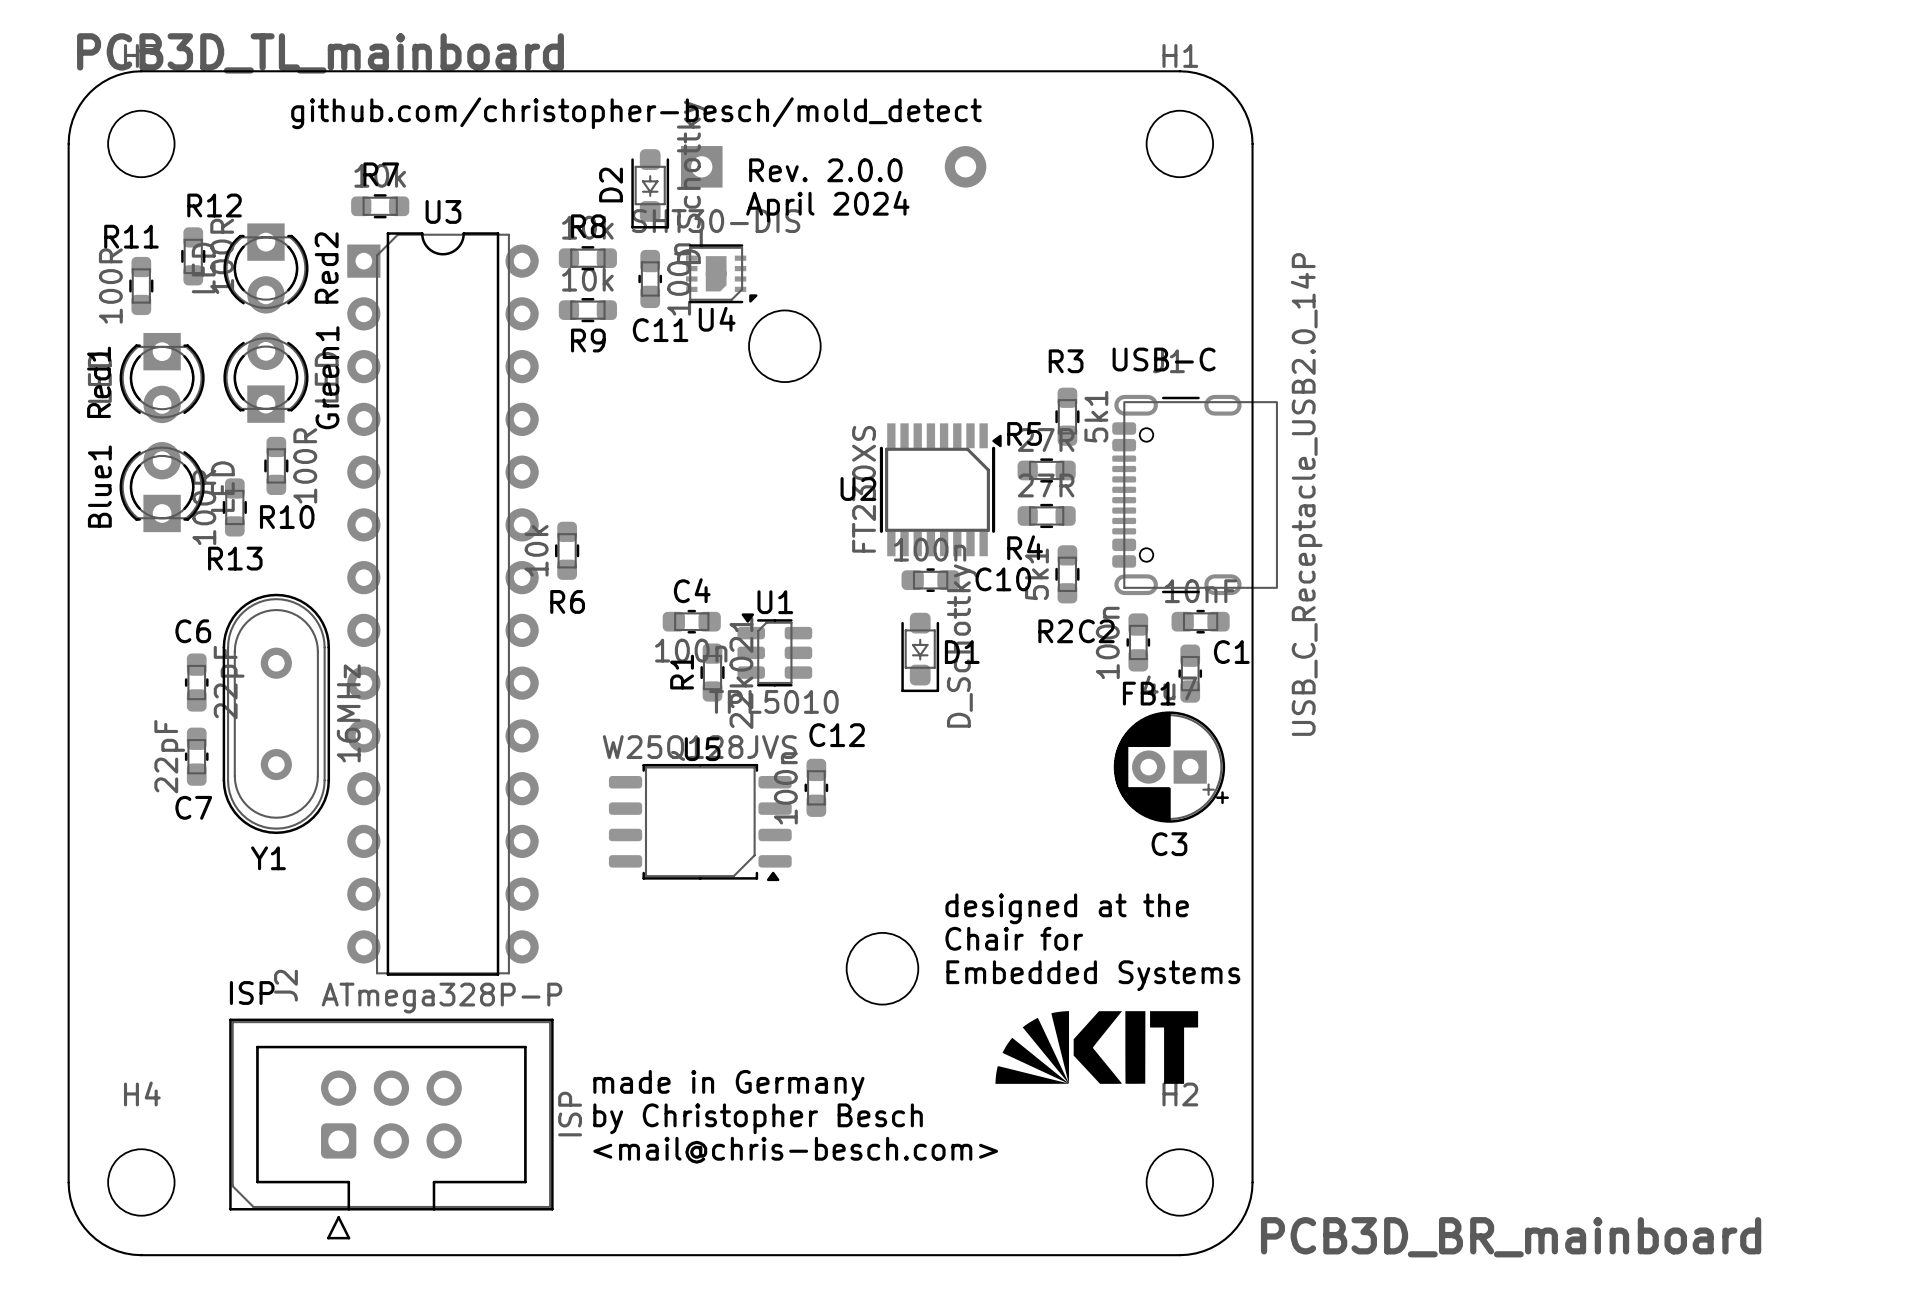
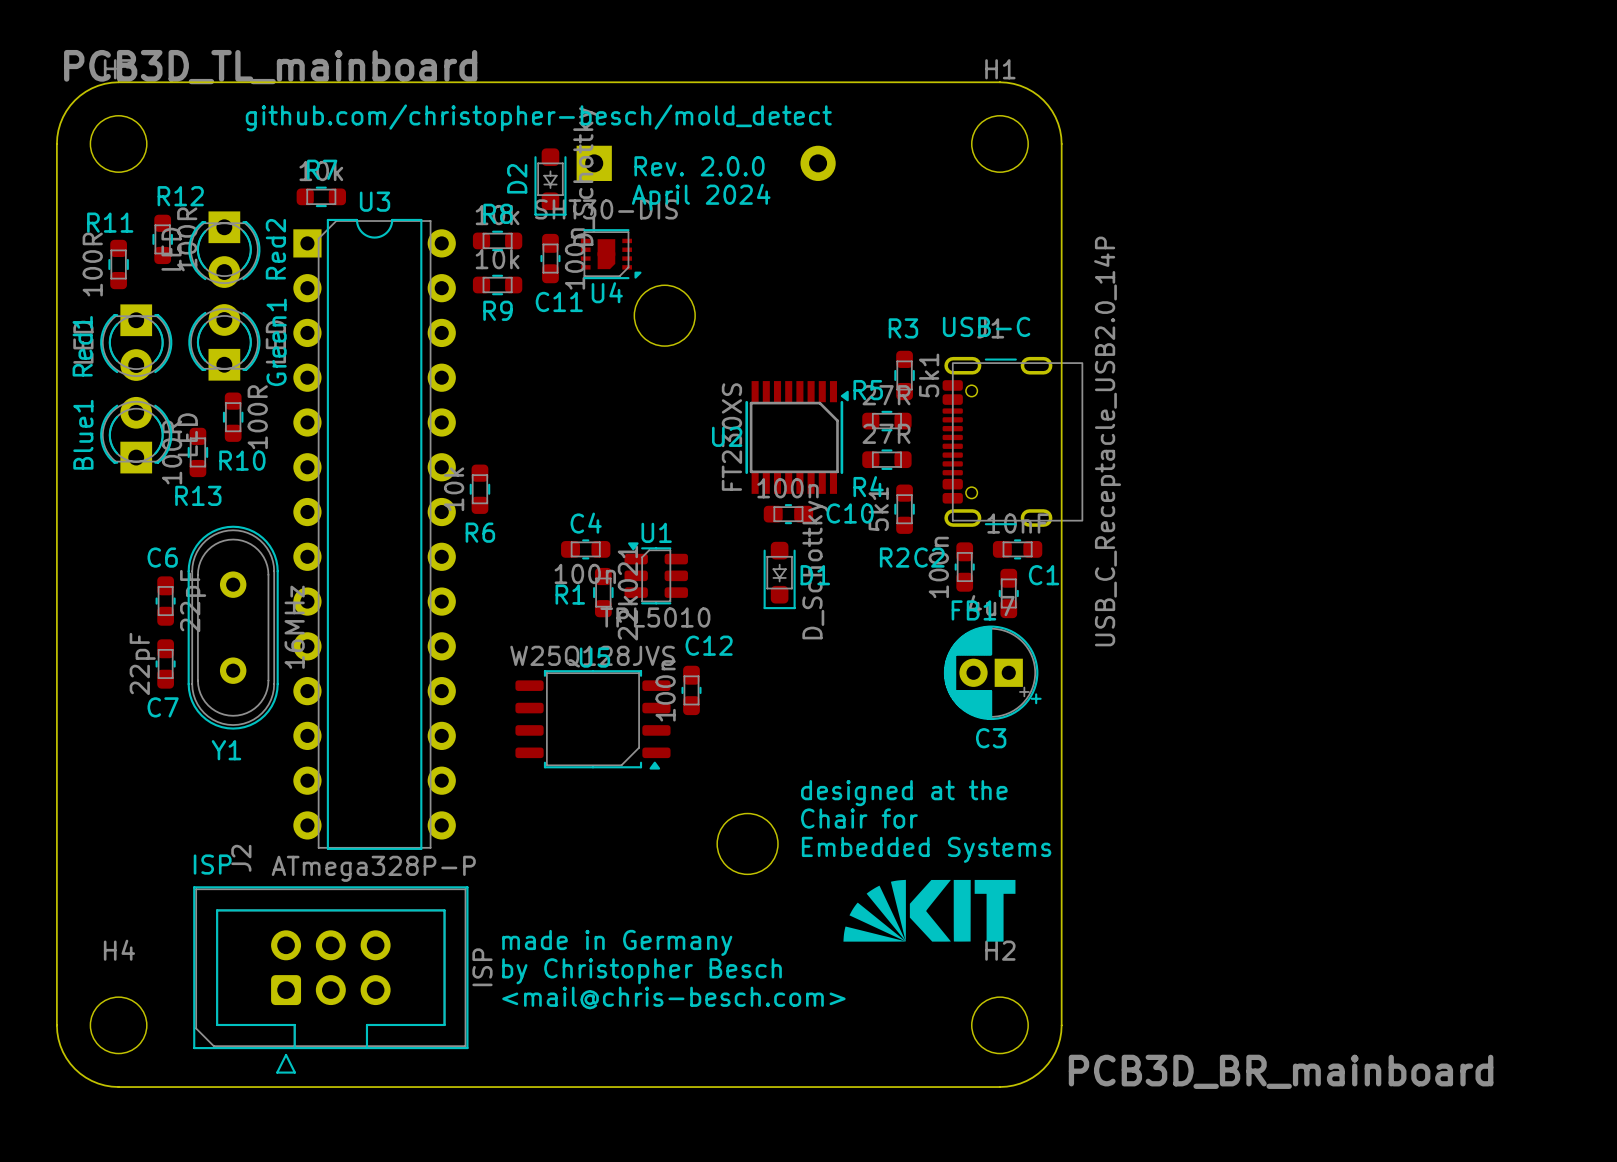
R1 name rotation: 0° (682, 672) -> 90° clockwise (570, 594)

